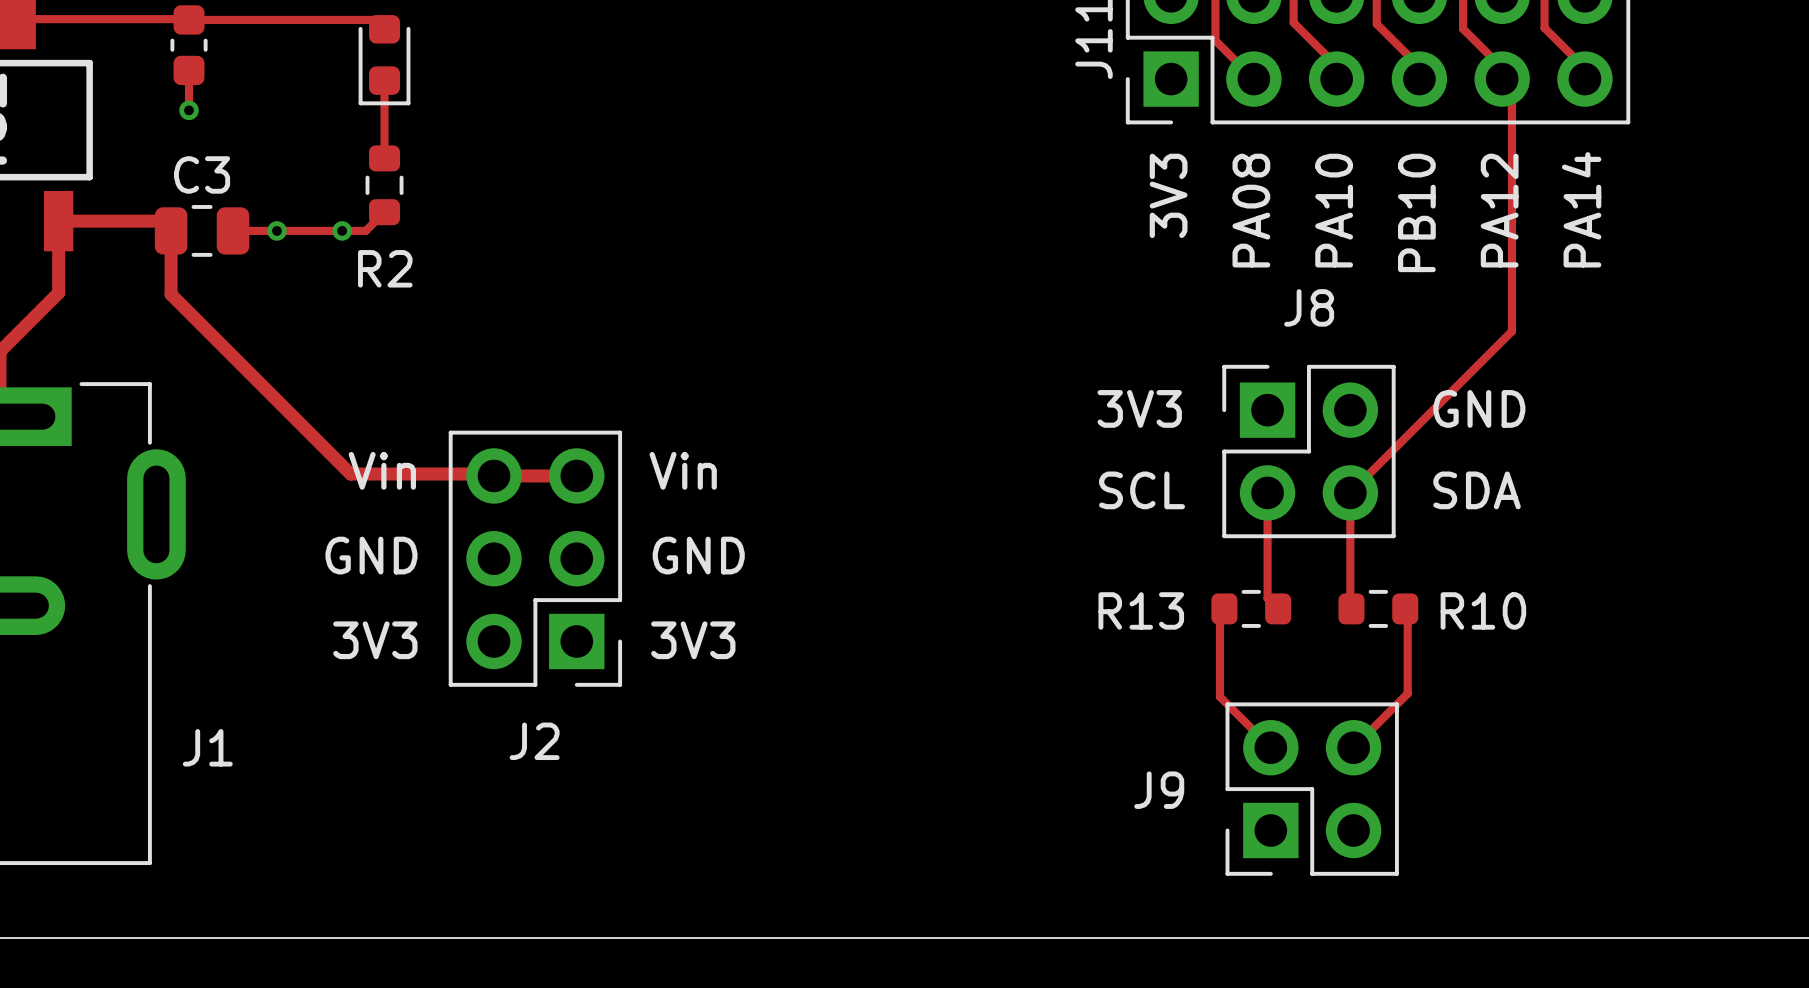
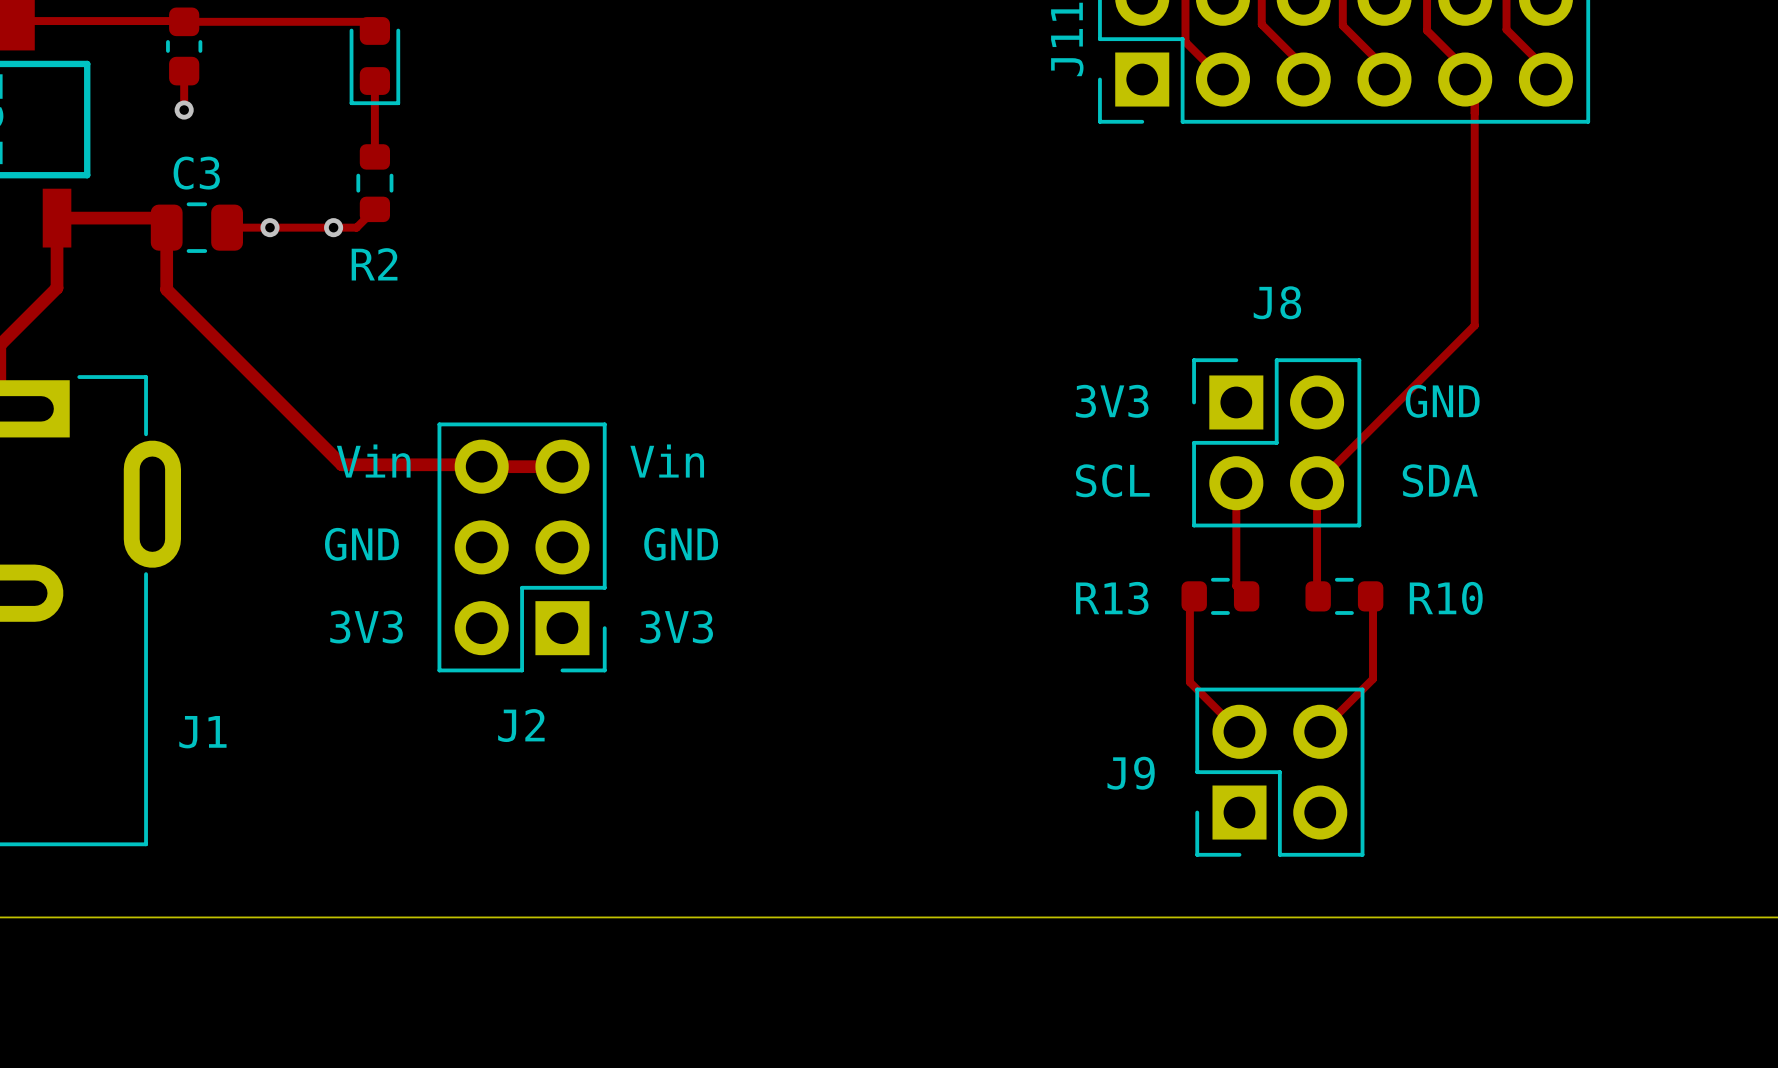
text: 3V3 (1168, 195) -> none
text: PA14 (1581, 209) -> none
text: PA08 (1251, 210) -> none
text: PA10 (1334, 210) -> none
text: PA12 (1499, 210) -> none
text: PB10 (1416, 212) -> none

